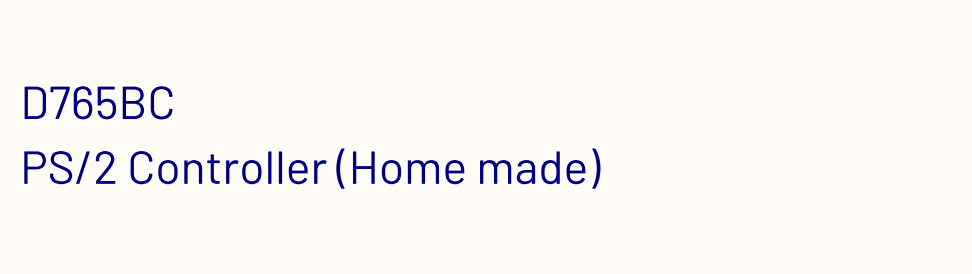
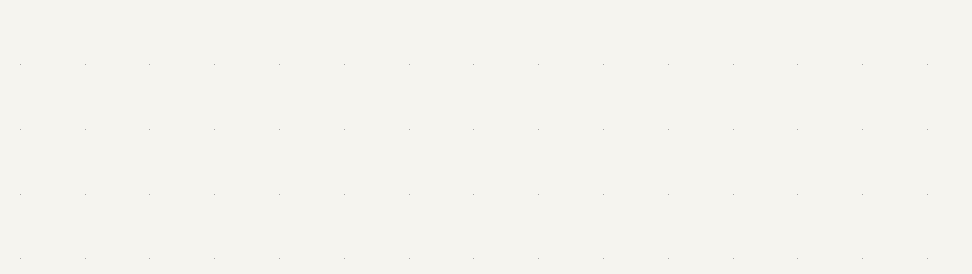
text: D765BC (98, 102) -> none
text: PS/2 Controller (Home made) (312, 168) -> none

